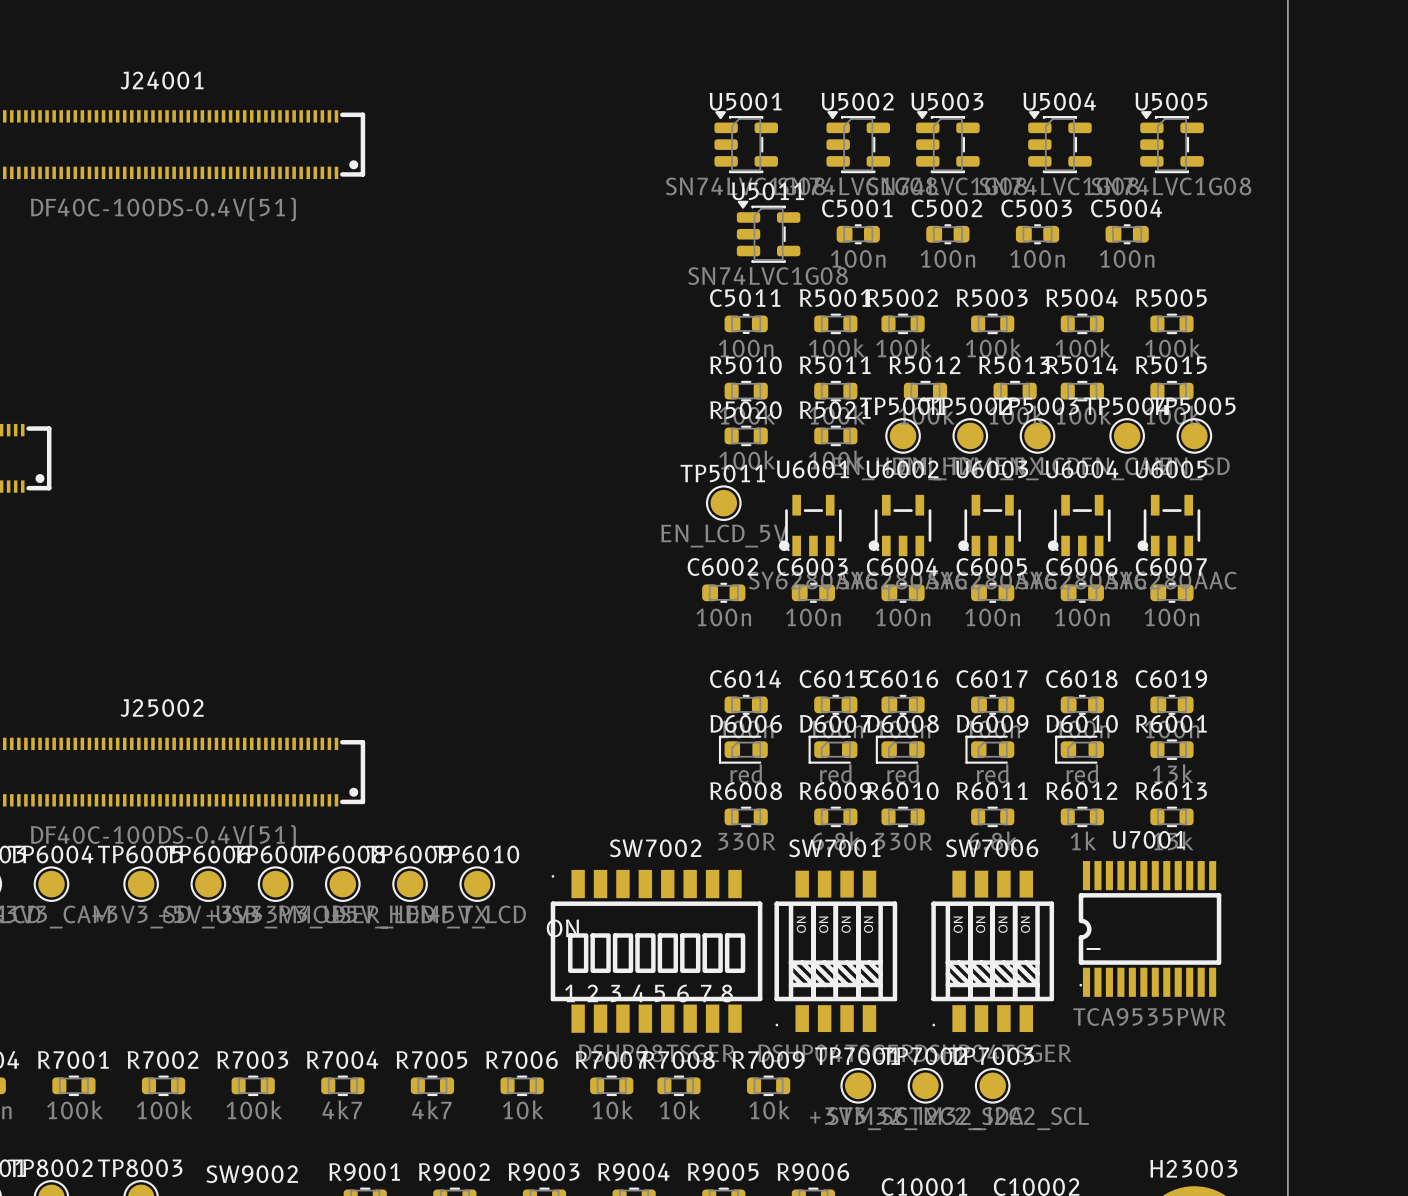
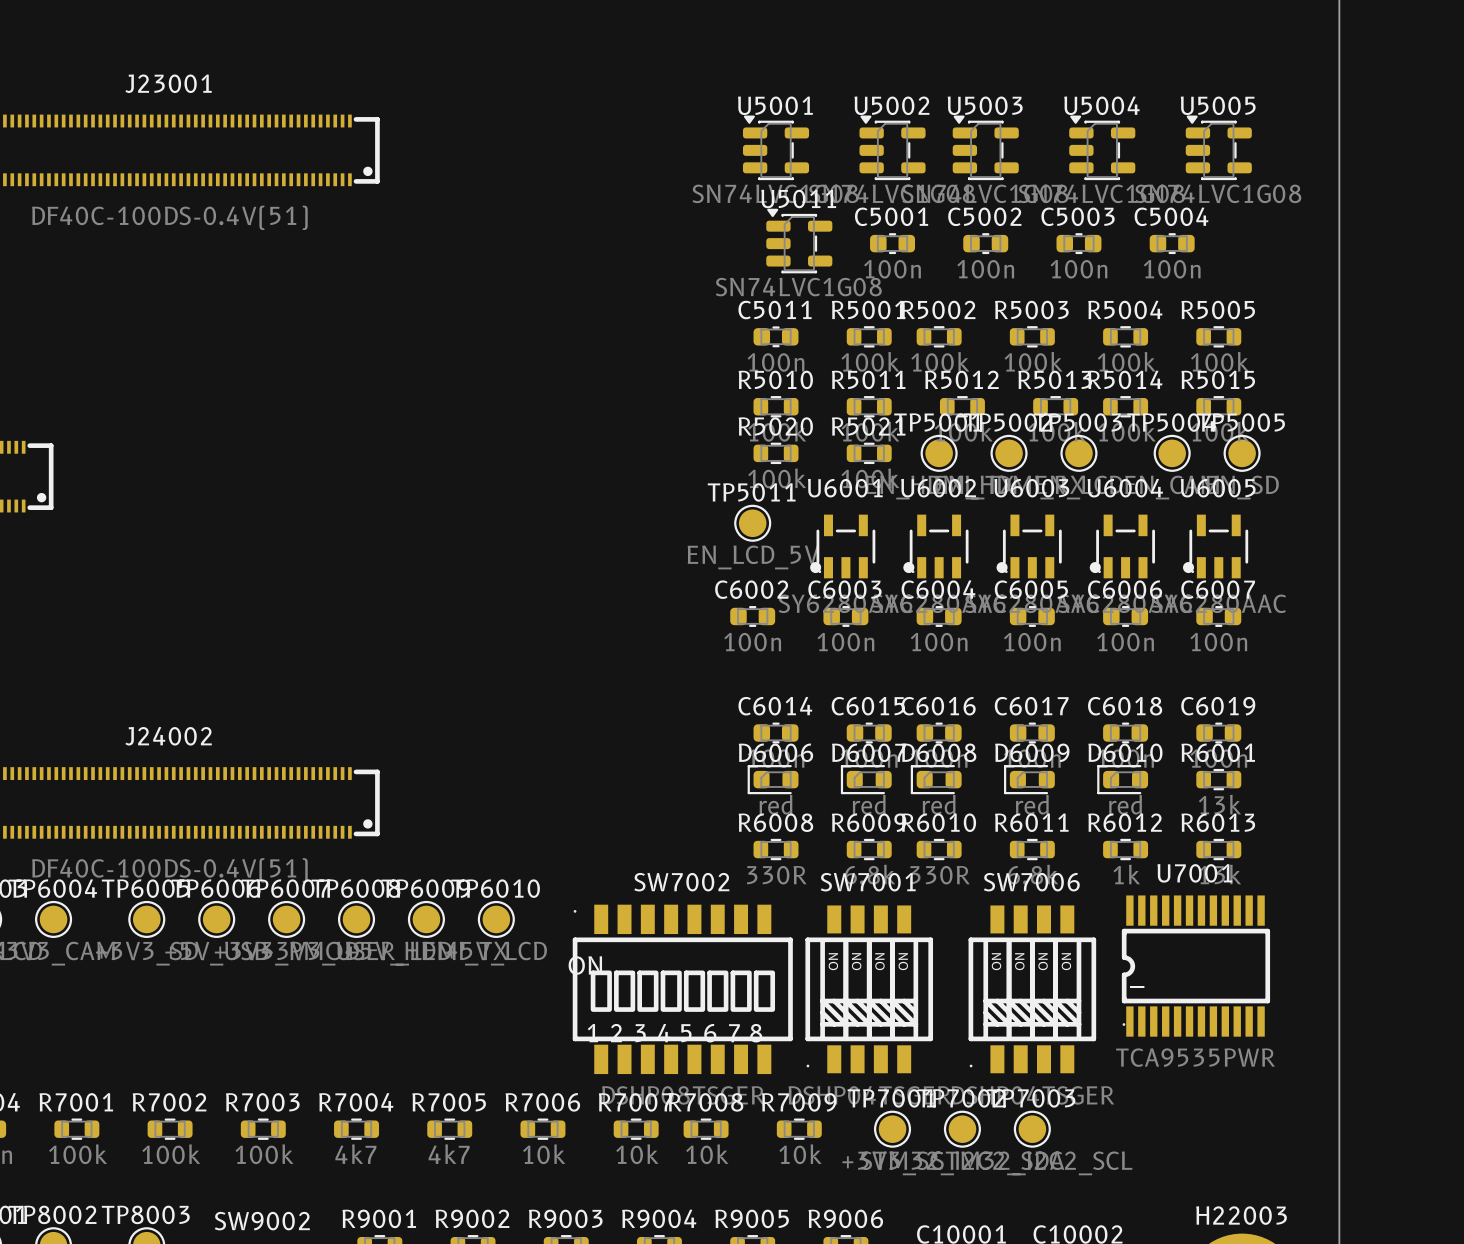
J24001 name: J24001 (162, 80) -> J23001 (168, 83)
J25002 name: J25002 (162, 708) -> J24002 (168, 736)
H23003 name: H23003 (1193, 1168) -> H22003 (1241, 1215)

